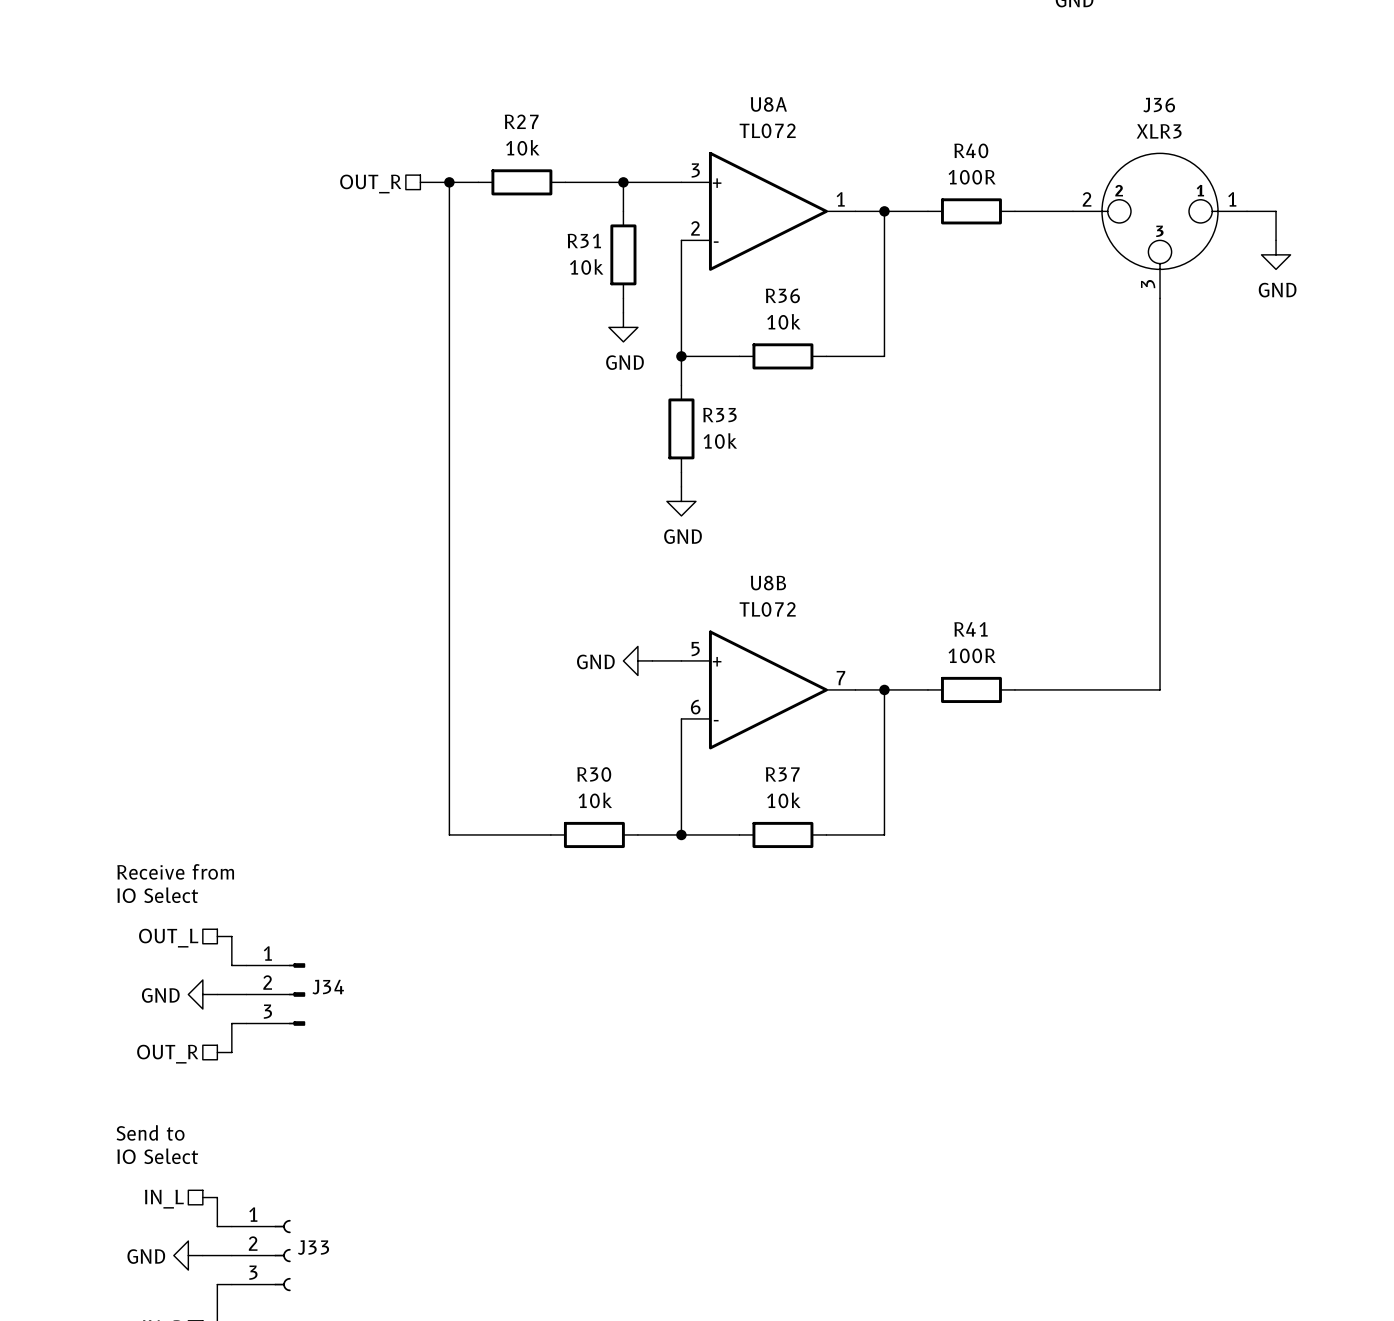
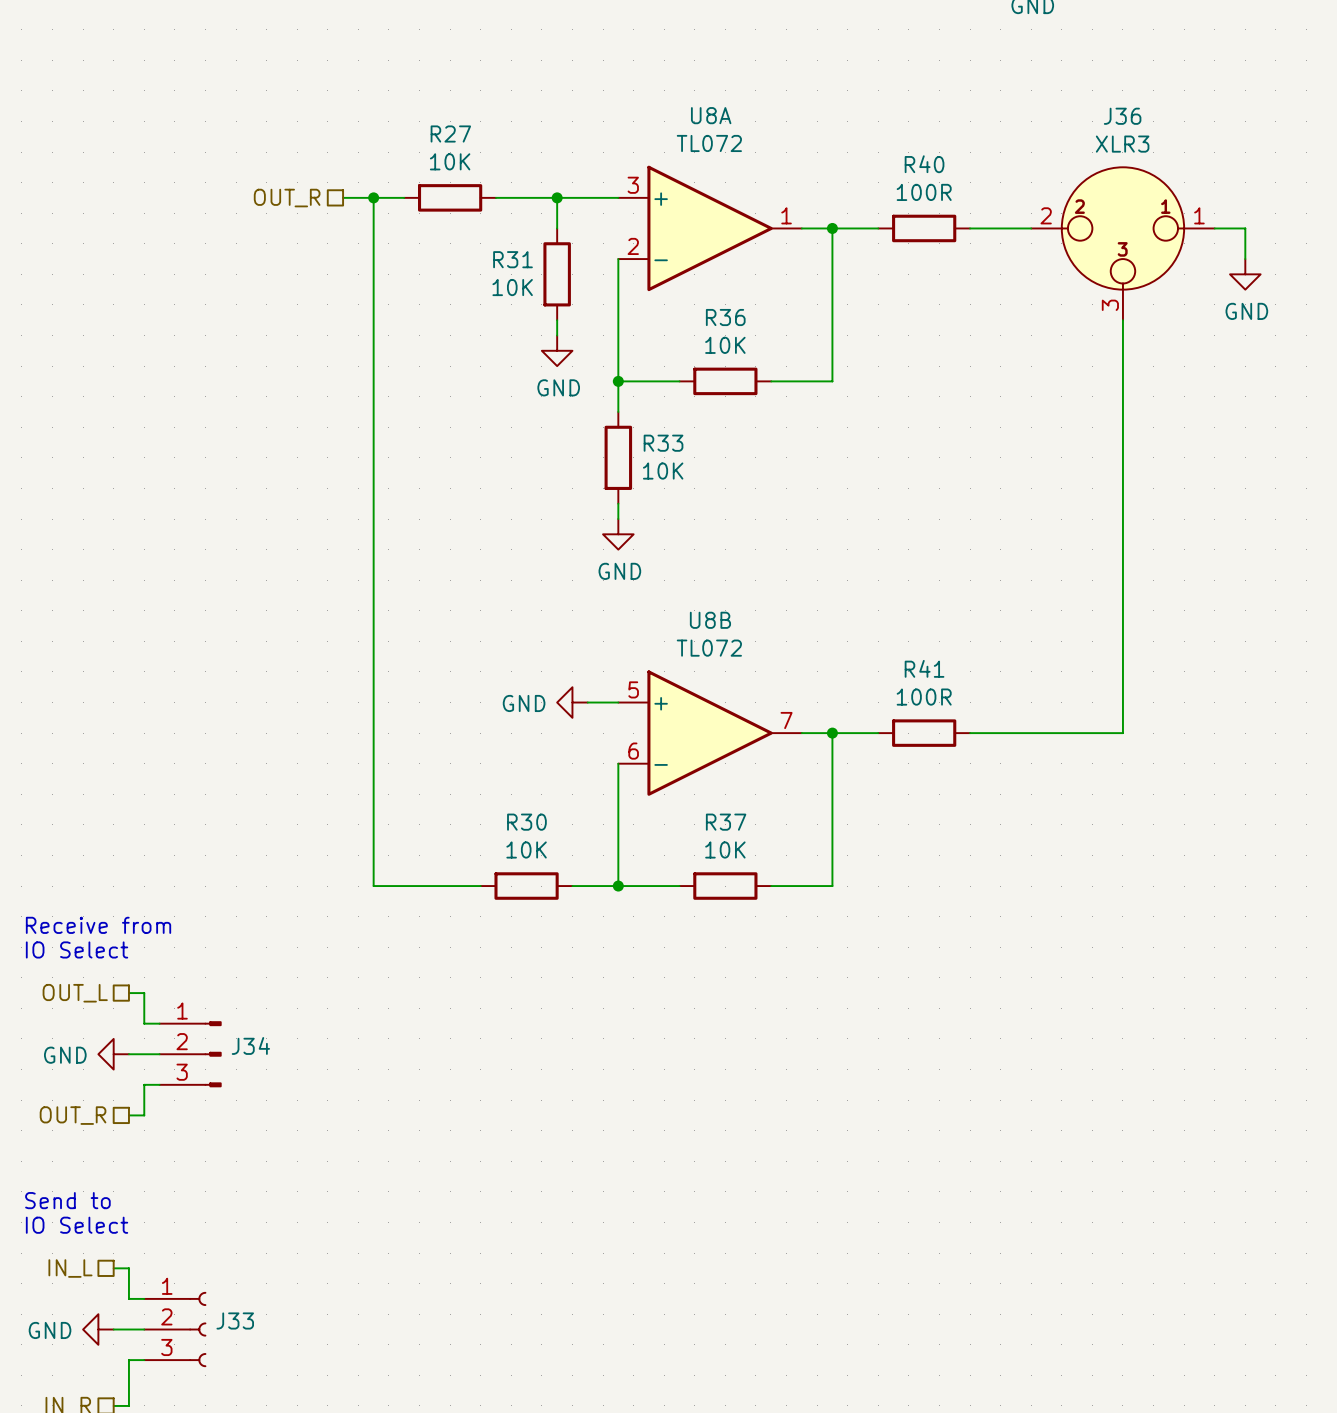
R27 value: 10k (522, 147) -> 10K (450, 161)
R31 value: 10k (586, 266) -> 10K (512, 287)
R36 value: 10k (783, 321) -> 10K (725, 345)
R33 value: 10k (720, 441) -> 10K (663, 471)
R30 value: 10k (595, 800) -> 10K (526, 849)
R37 value: 10k (783, 800) -> 10K (725, 849)

